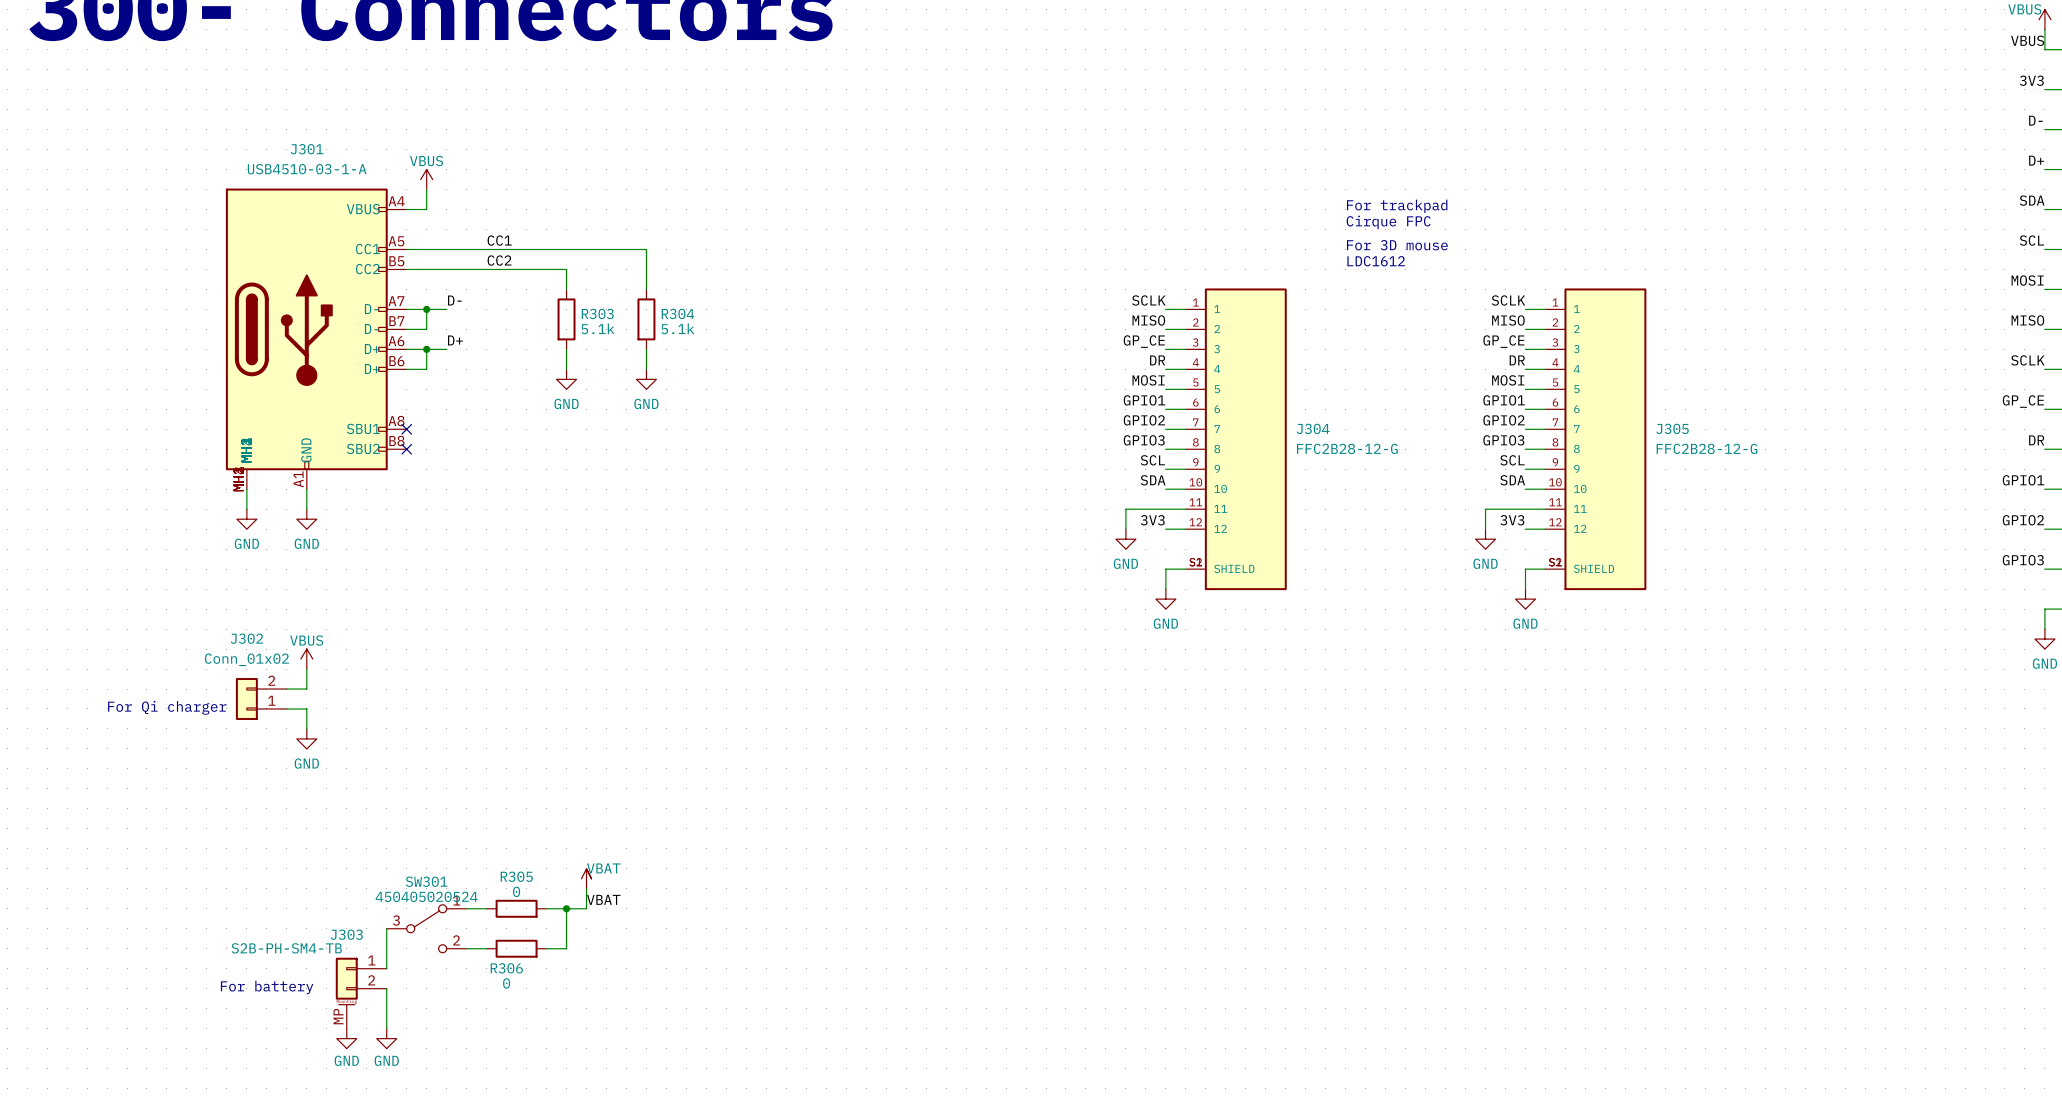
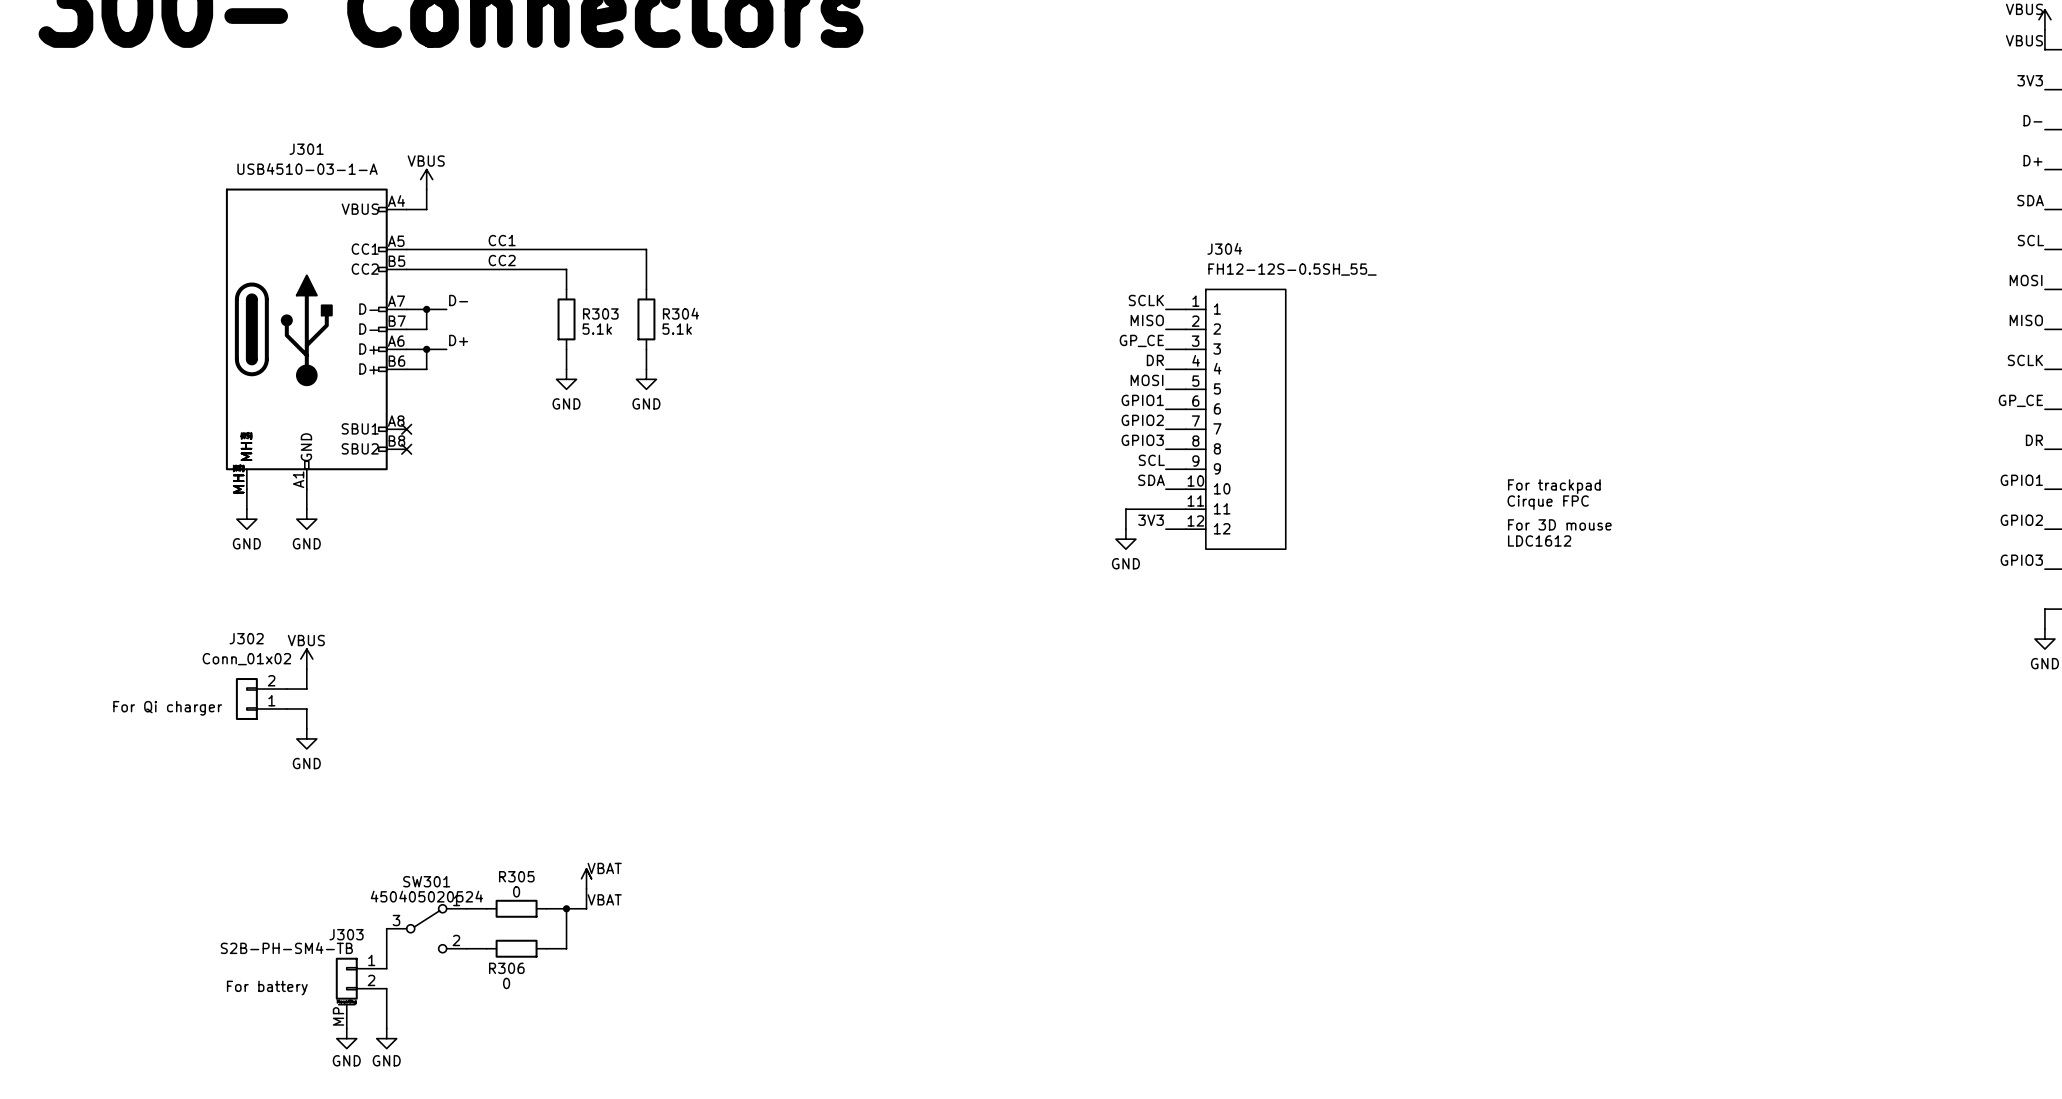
text: For trackpad (1397, 206) -> none
text: Cirque FPC (1388, 222) -> none
text: For 3D mouse (1397, 245) -> none
text: LDC1612 (1376, 261) -> none
J304 symbol: [1185, 288, 1287, 591] -> [1185, 288, 1287, 550]
label: SCLK (1508, 300) -> none
wire: (1525, 309) (1545, 309) -> none
label: MISO (1508, 320) -> none
wire: (1525, 329) (1545, 329) -> none
label: GP_CE (1503, 341) -> none
wire: (1525, 349) (1545, 349) -> none
label: DR (1517, 360) -> none
wire: (1525, 369) (1545, 369) -> none
label: MOSI (1508, 380) -> none
wire: (1525, 389) (1545, 389) -> none
label: GPIO1 (1504, 400) -> none
wire: (1525, 409) (1545, 409) -> none
label: GPIO2 (1503, 420) -> none
J304 name position: J304 (1313, 428) -> J304 (1224, 248)
wire: (1525, 429) (1545, 429) -> none
J305: FFC2B28-12-G (1595, 439) -> none
label: GPIO3 (1503, 440) -> none
J304 value: FFC2B28-12-G (1347, 448) -> FH12-12S-0.5SH_55_ (1292, 269)
wire: (1525, 449) (1545, 449) -> none
label: SCL (1512, 460) -> none
wire: (1525, 469) (1545, 469) -> none
label: SDA (1512, 480) -> none
text: none -> For trackpad (1554, 486)
wire: (1525, 489) (1545, 489) -> none
text: none -> Cirque FPC (1548, 502)
wire: (1545, 509) (1485, 509) (1485, 529) -> none
label: 3V3 (1512, 520) -> none
text: none -> For 3D mouse (1559, 524)
wire: (1525, 529) (1545, 529) -> none
power symbol: GND (1485, 539) -> none
text: none -> LDC1612 (1539, 540)
wire: (1185, 569) (1165, 569) (1165, 589) -> none
wire: (1545, 569) (1525, 569) (1525, 589) -> none
power symbol: GND (1165, 599) -> none
power symbol: GND (1525, 599) -> none

